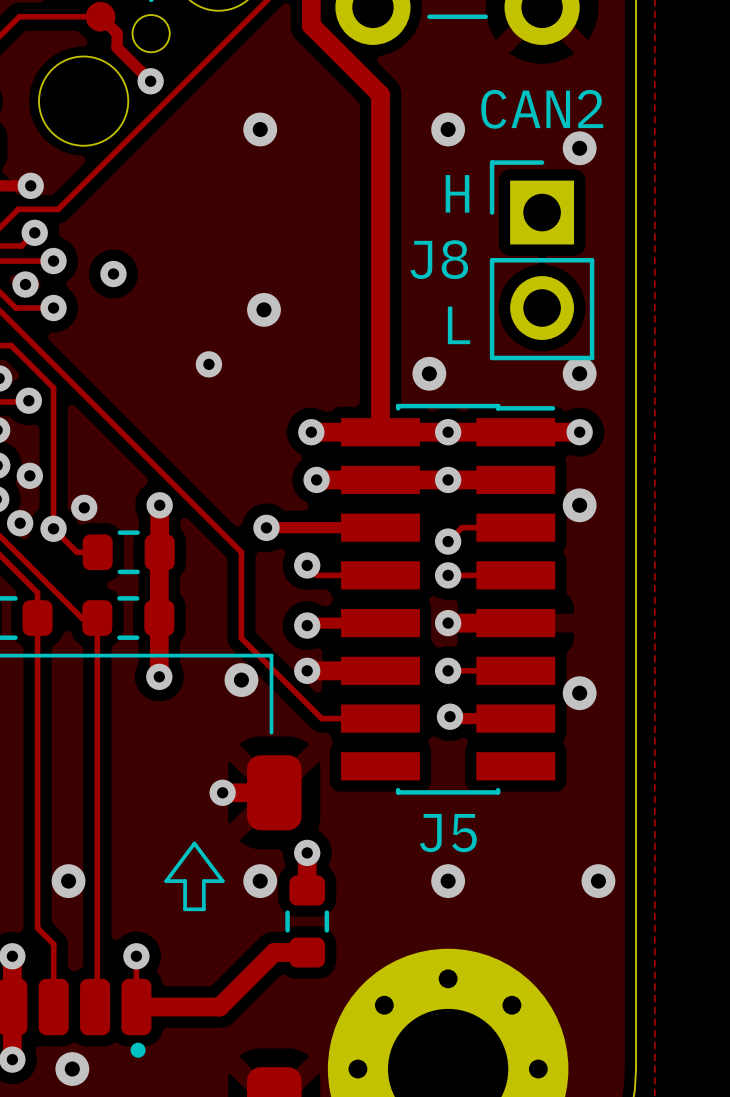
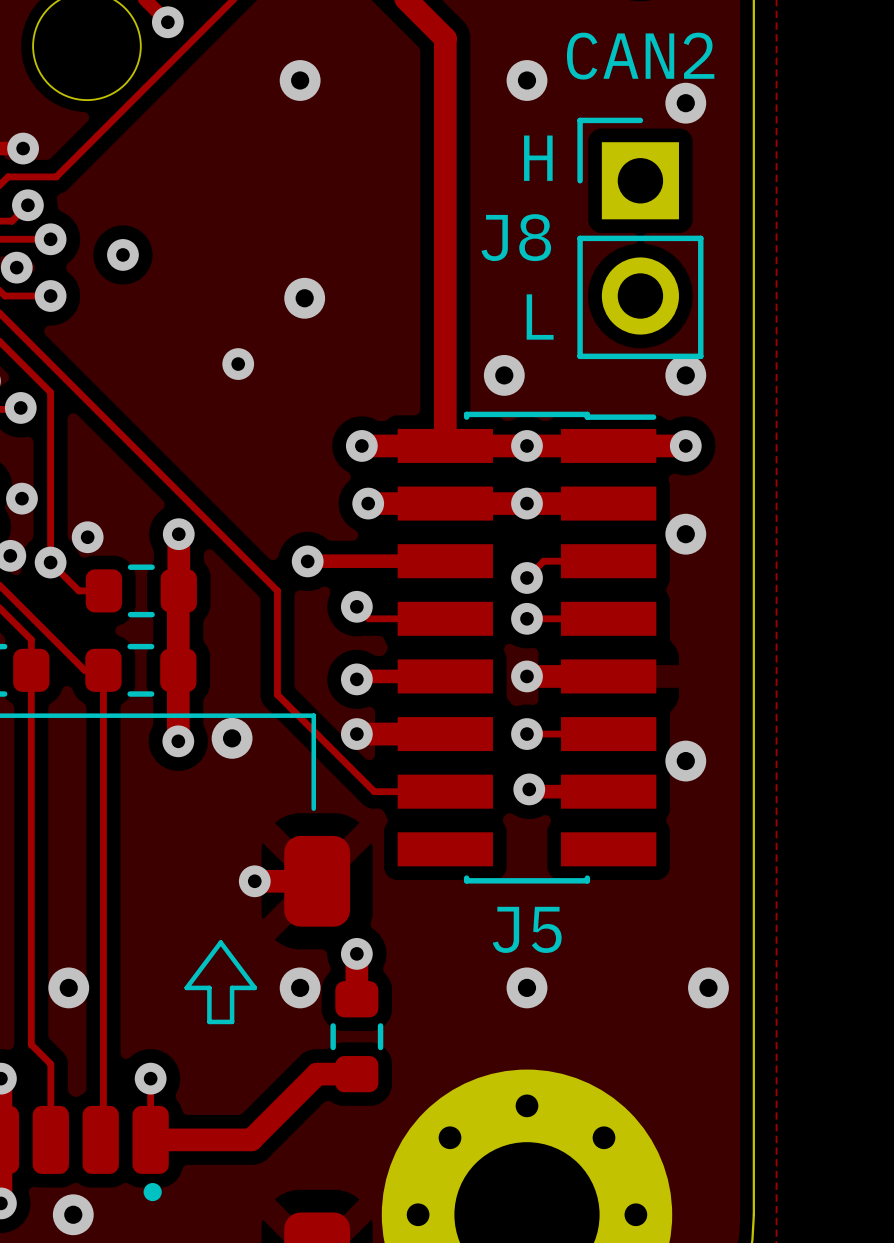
via position: (241, 680) -> (232, 738)

